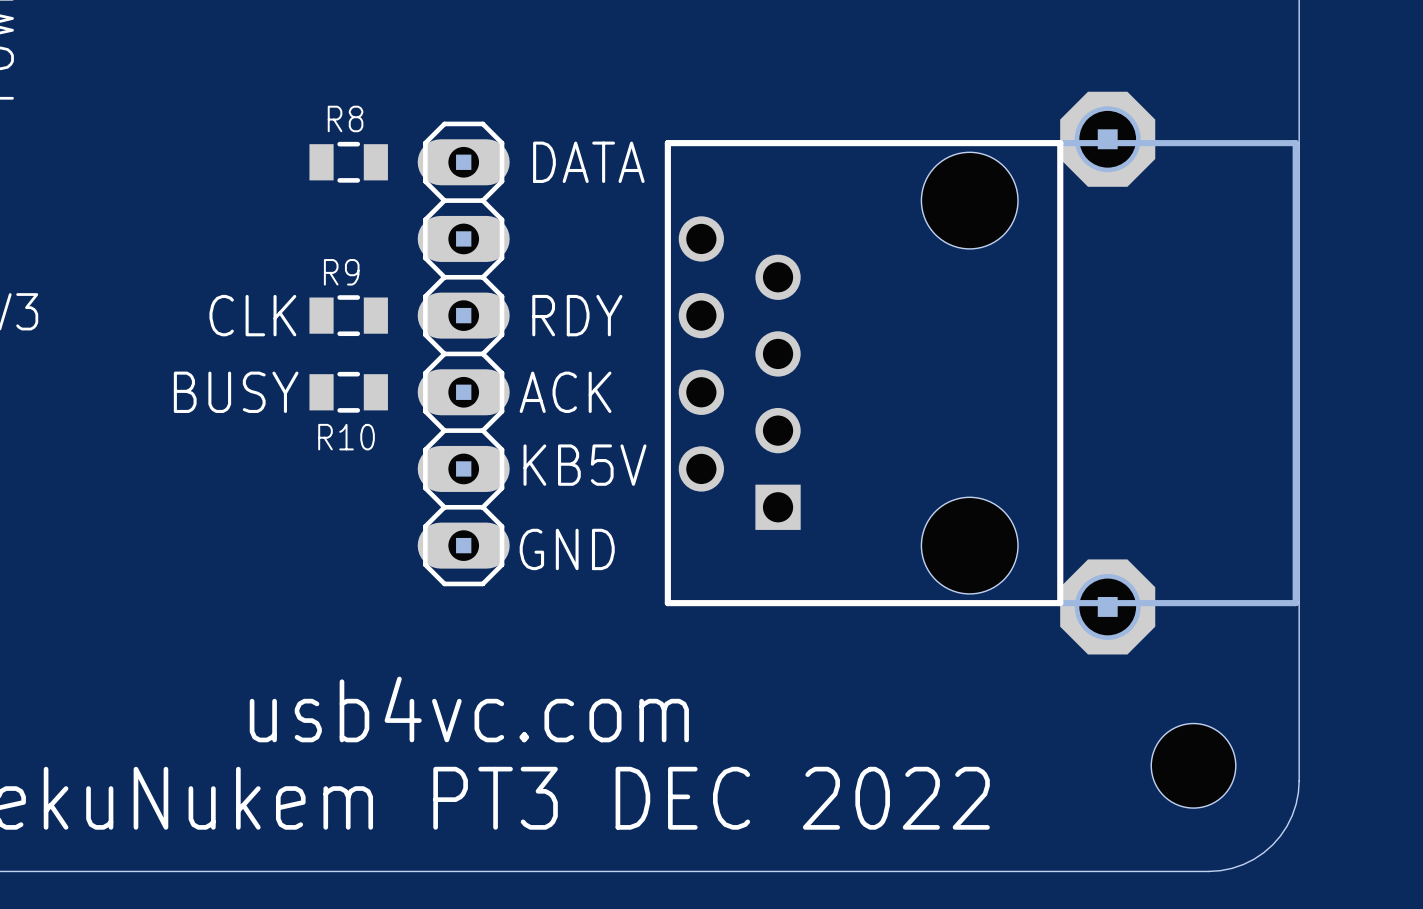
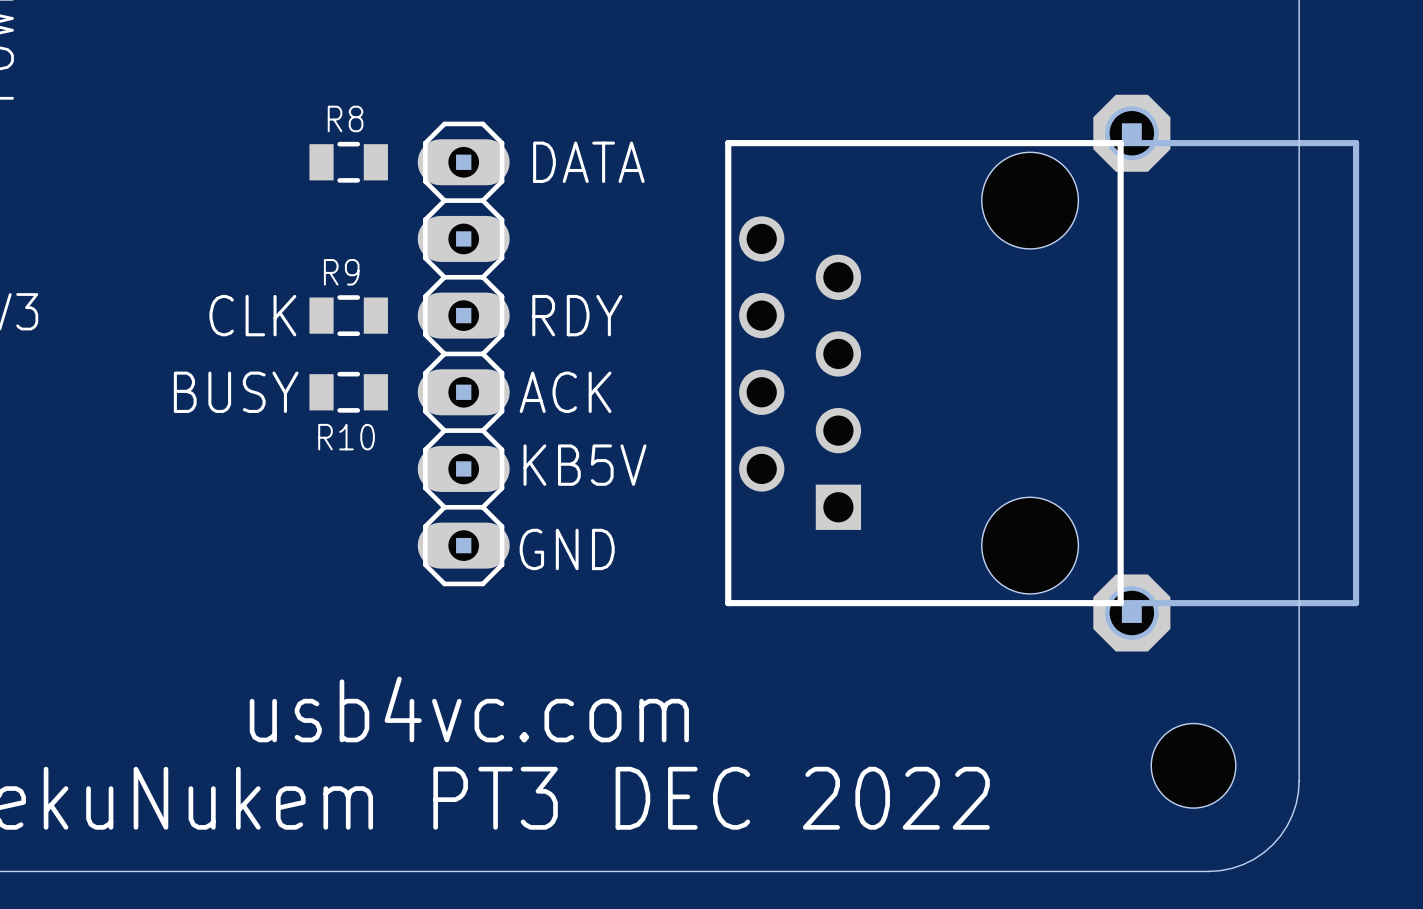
part footprint: [1060, 91, 1156, 187] -> [1093, 94, 1171, 172]
part position: (981, 373) -> (1042, 373)
part footprint: [1060, 559, 1156, 655] -> [1093, 574, 1171, 652]

